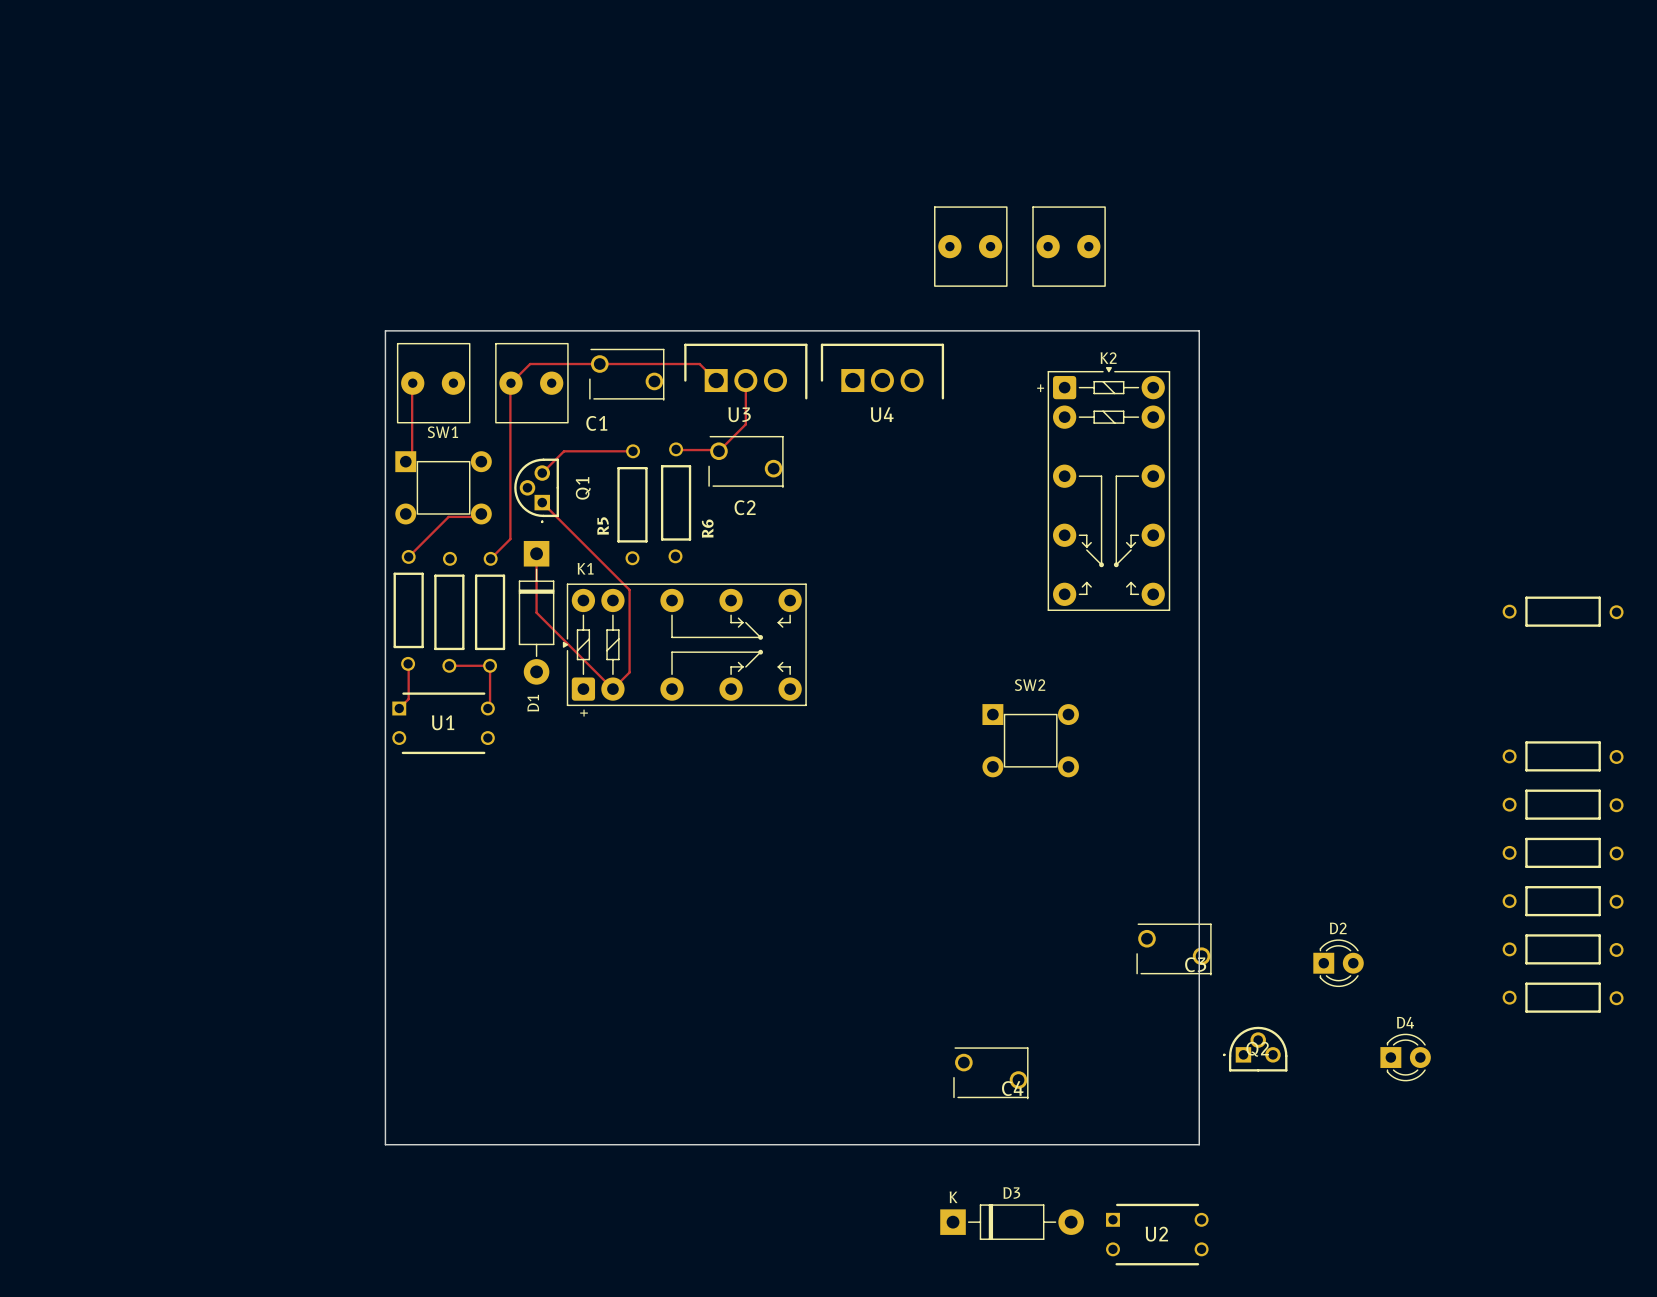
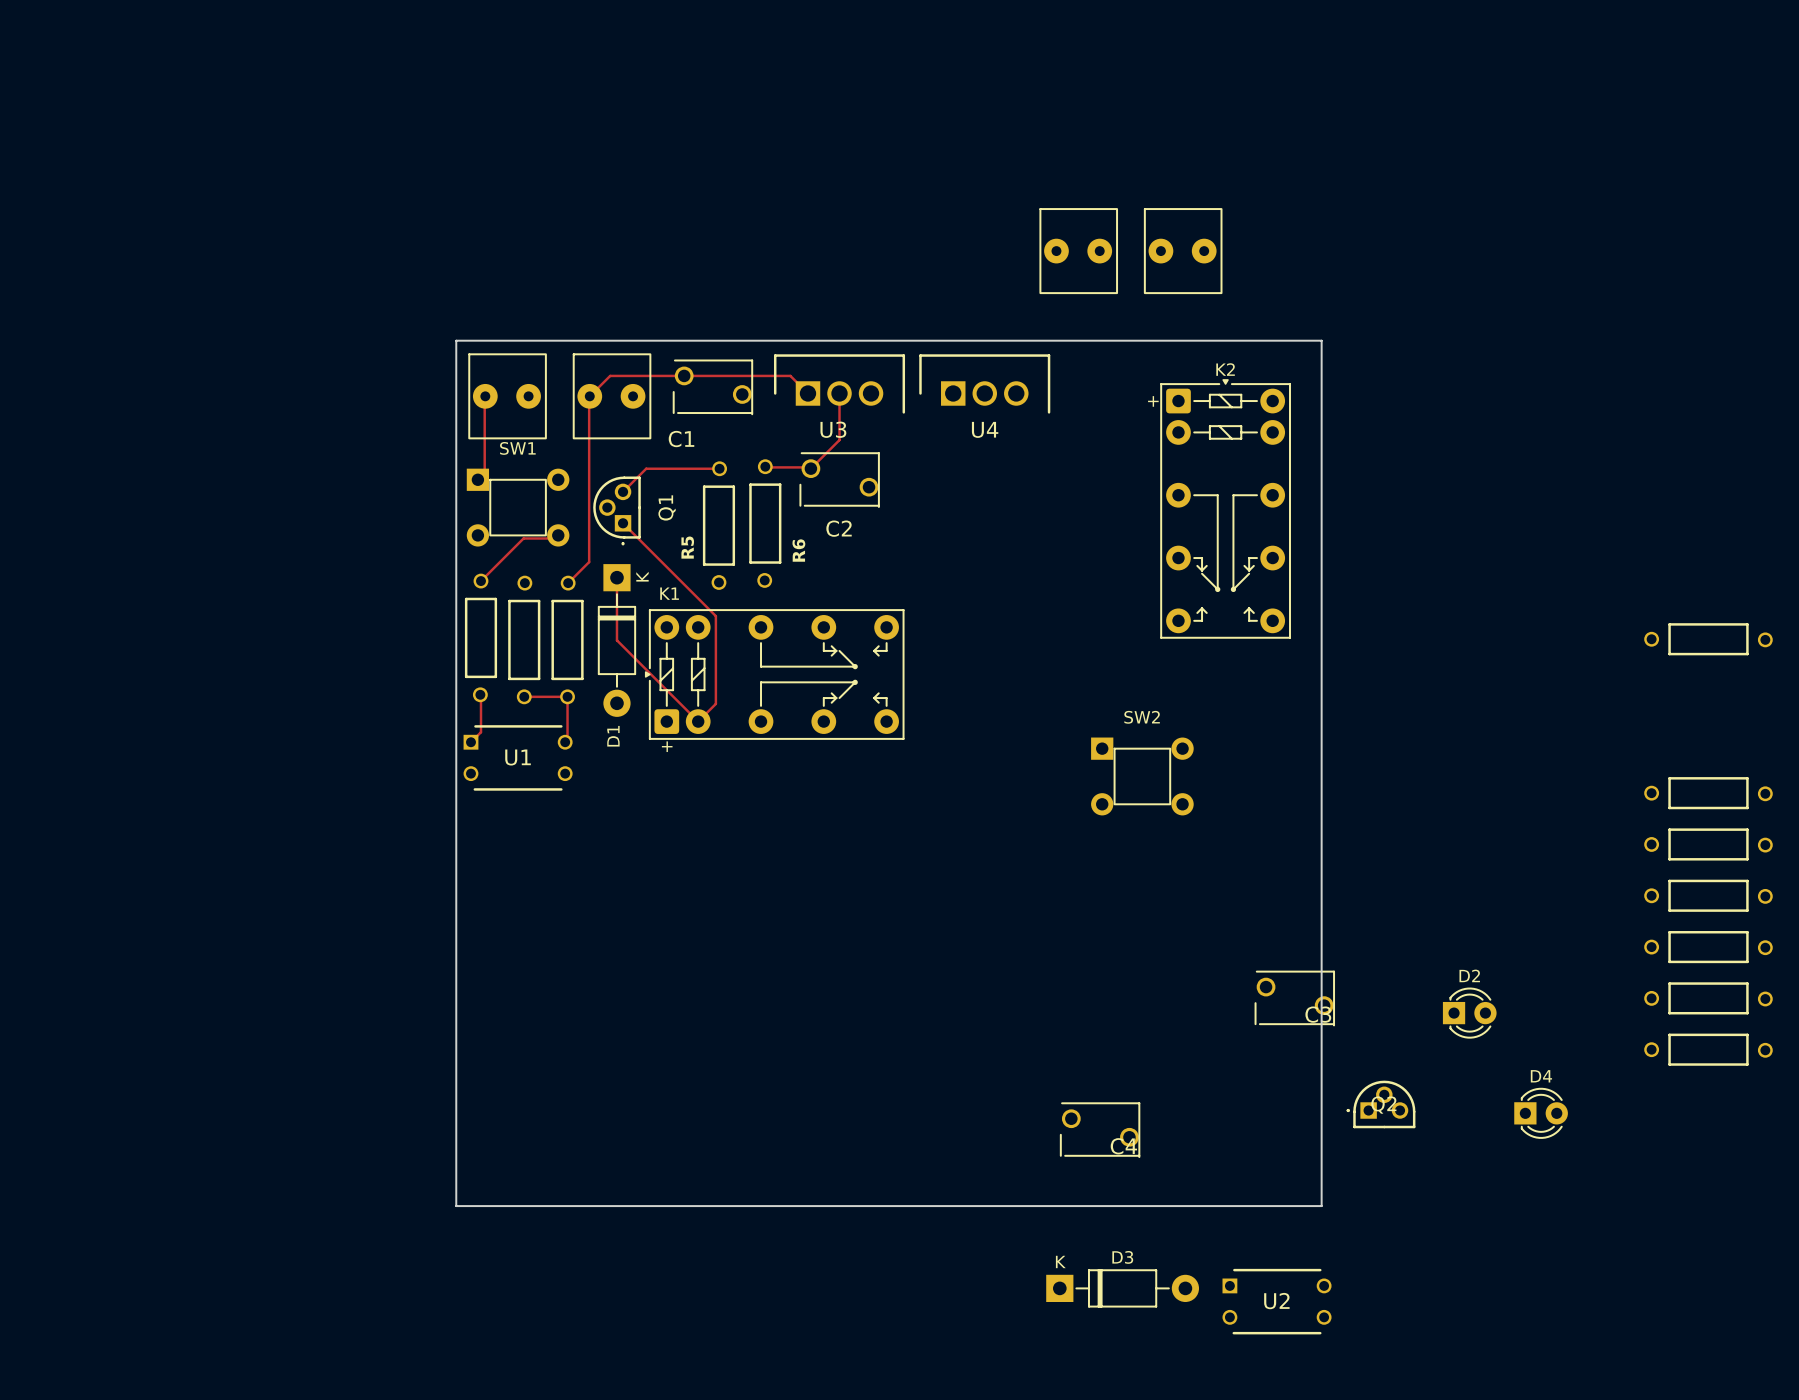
D1 text: none -> K (642, 576)

